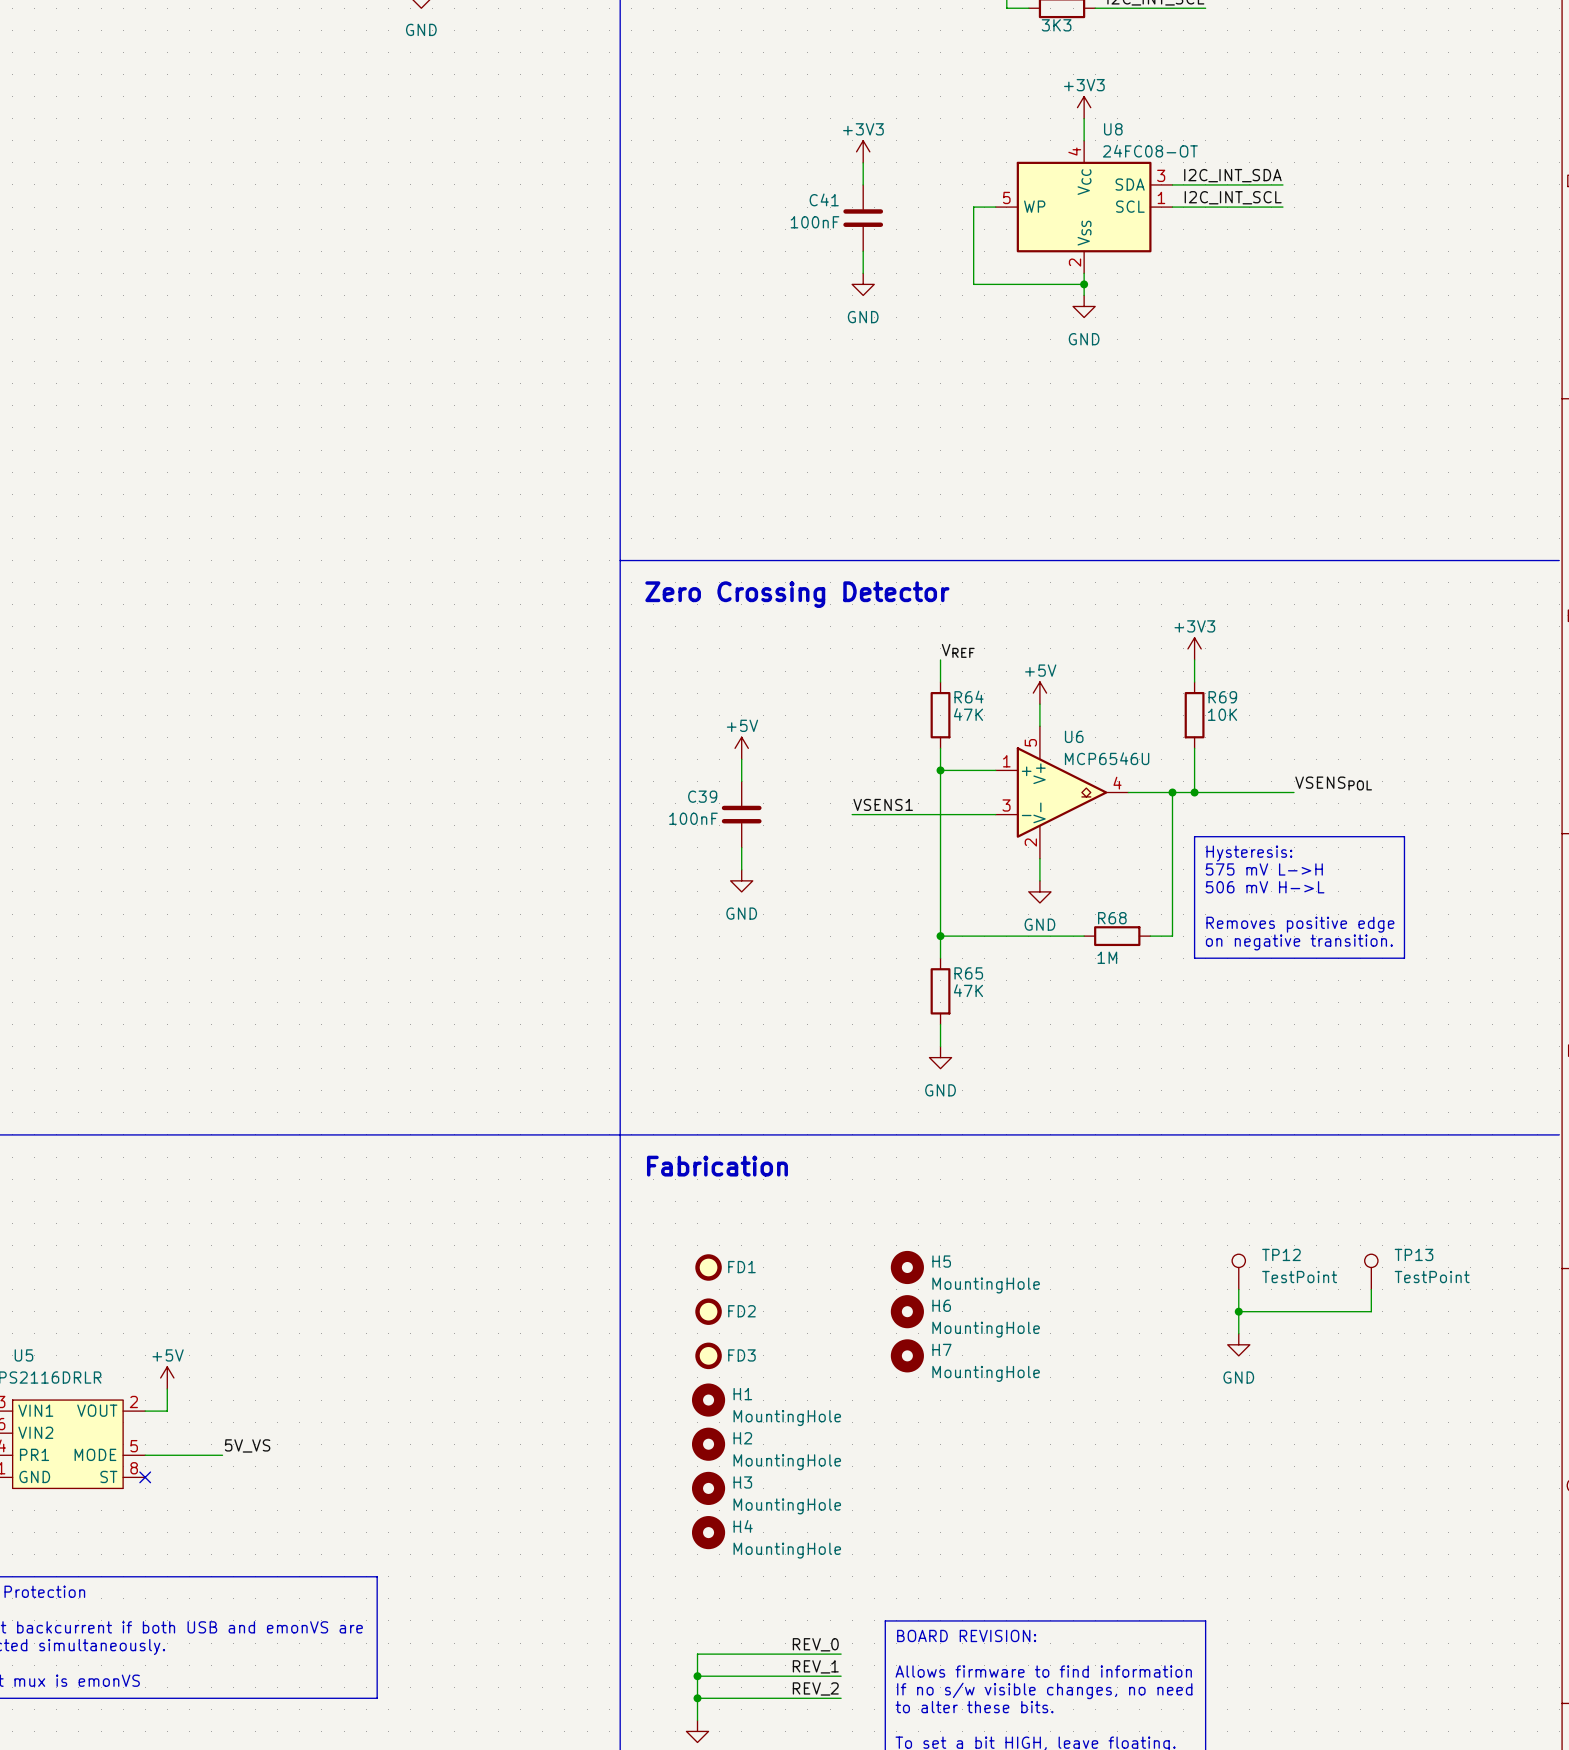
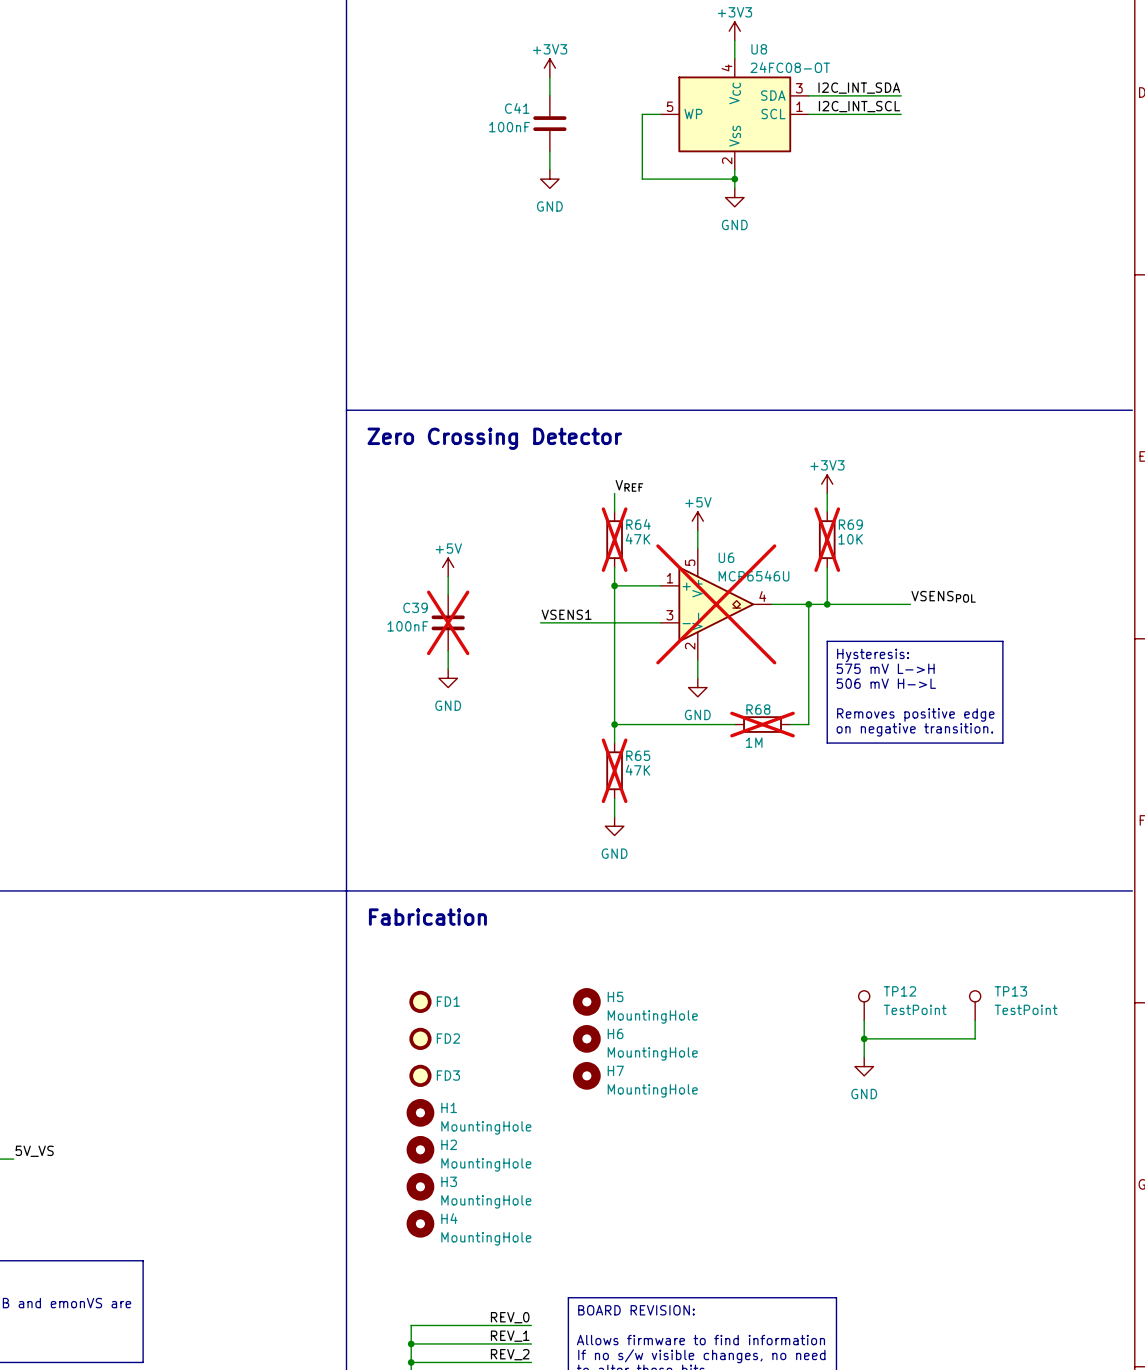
R64 do-not-place cross: none -> (614, 539)
R69 do-not-place cross: none -> (827, 539)
U6 do-not-place cross: none -> (716, 604)
C39 do-not-place cross: none -> (448, 622)
R68 do-not-place cross: none -> (762, 724)
R65 do-not-place cross: none -> (614, 770)

